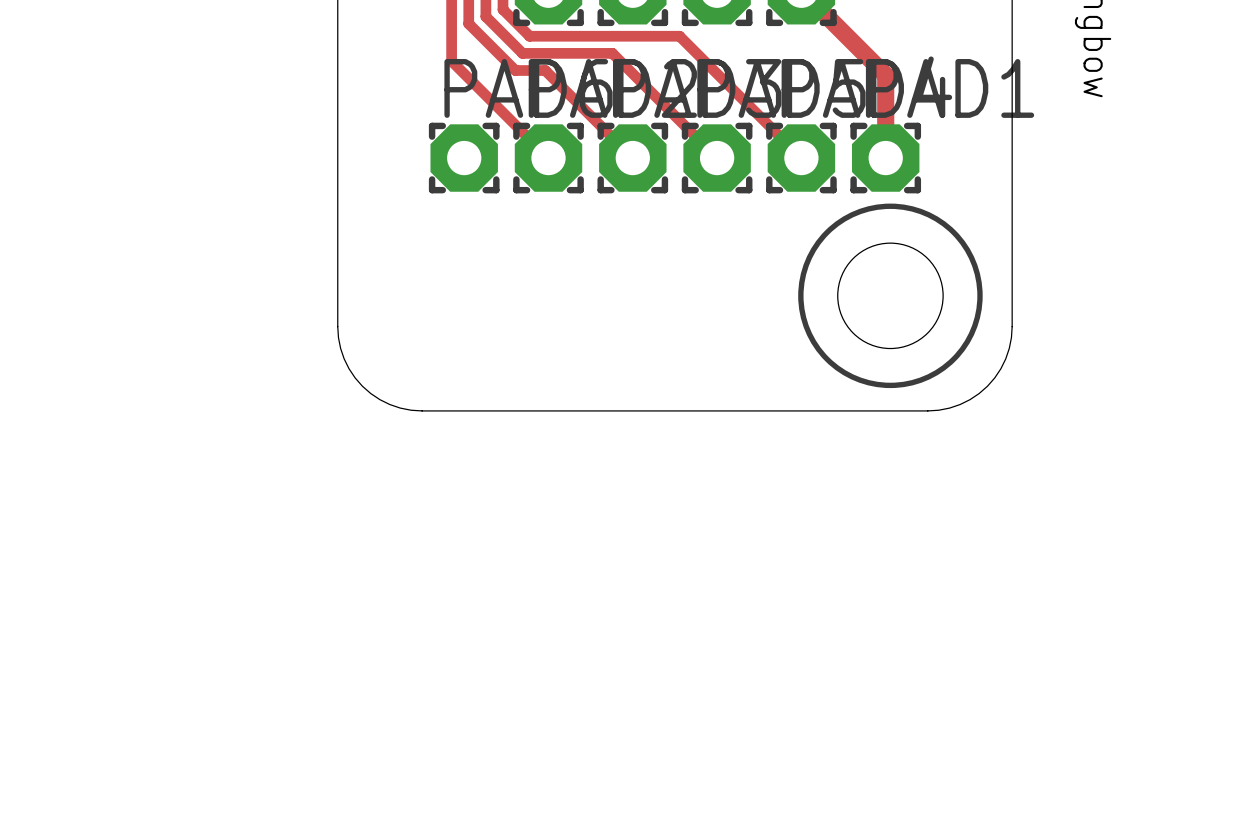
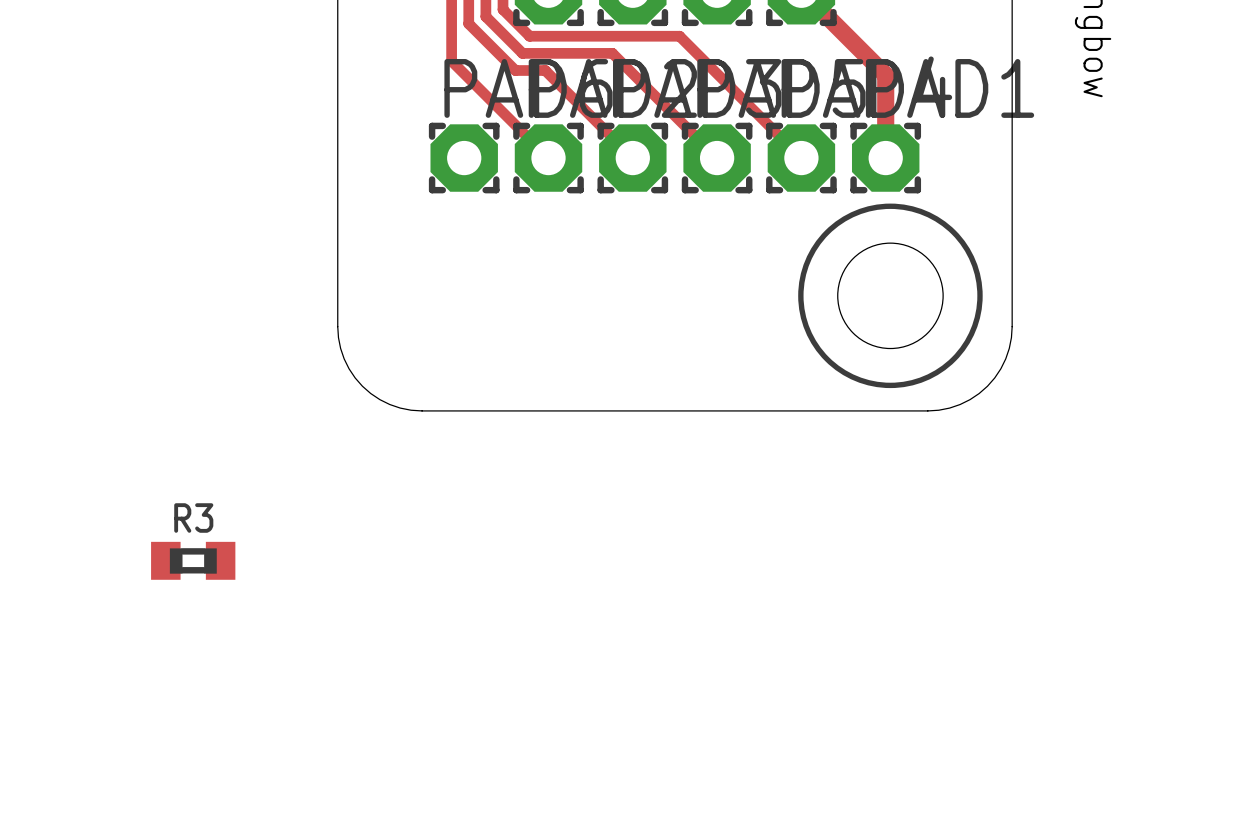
R3: none -> (193, 560)

